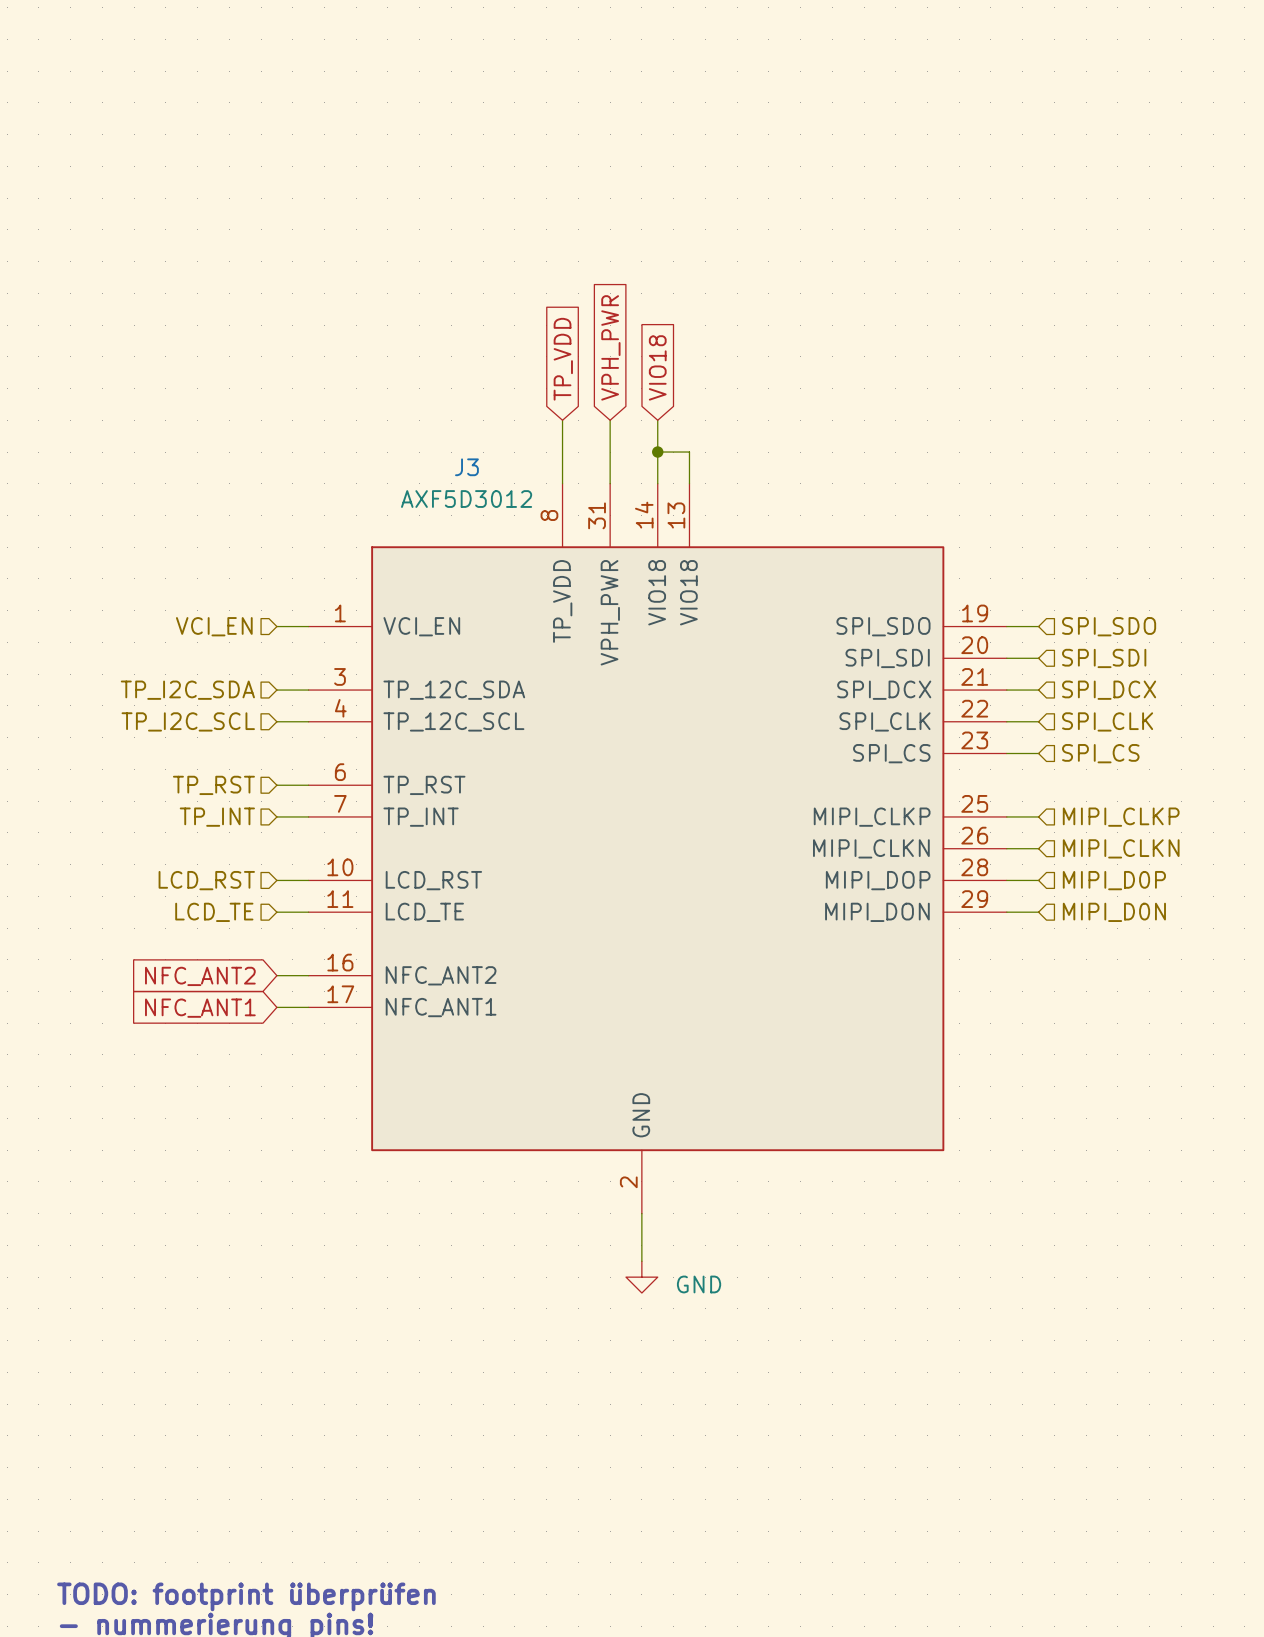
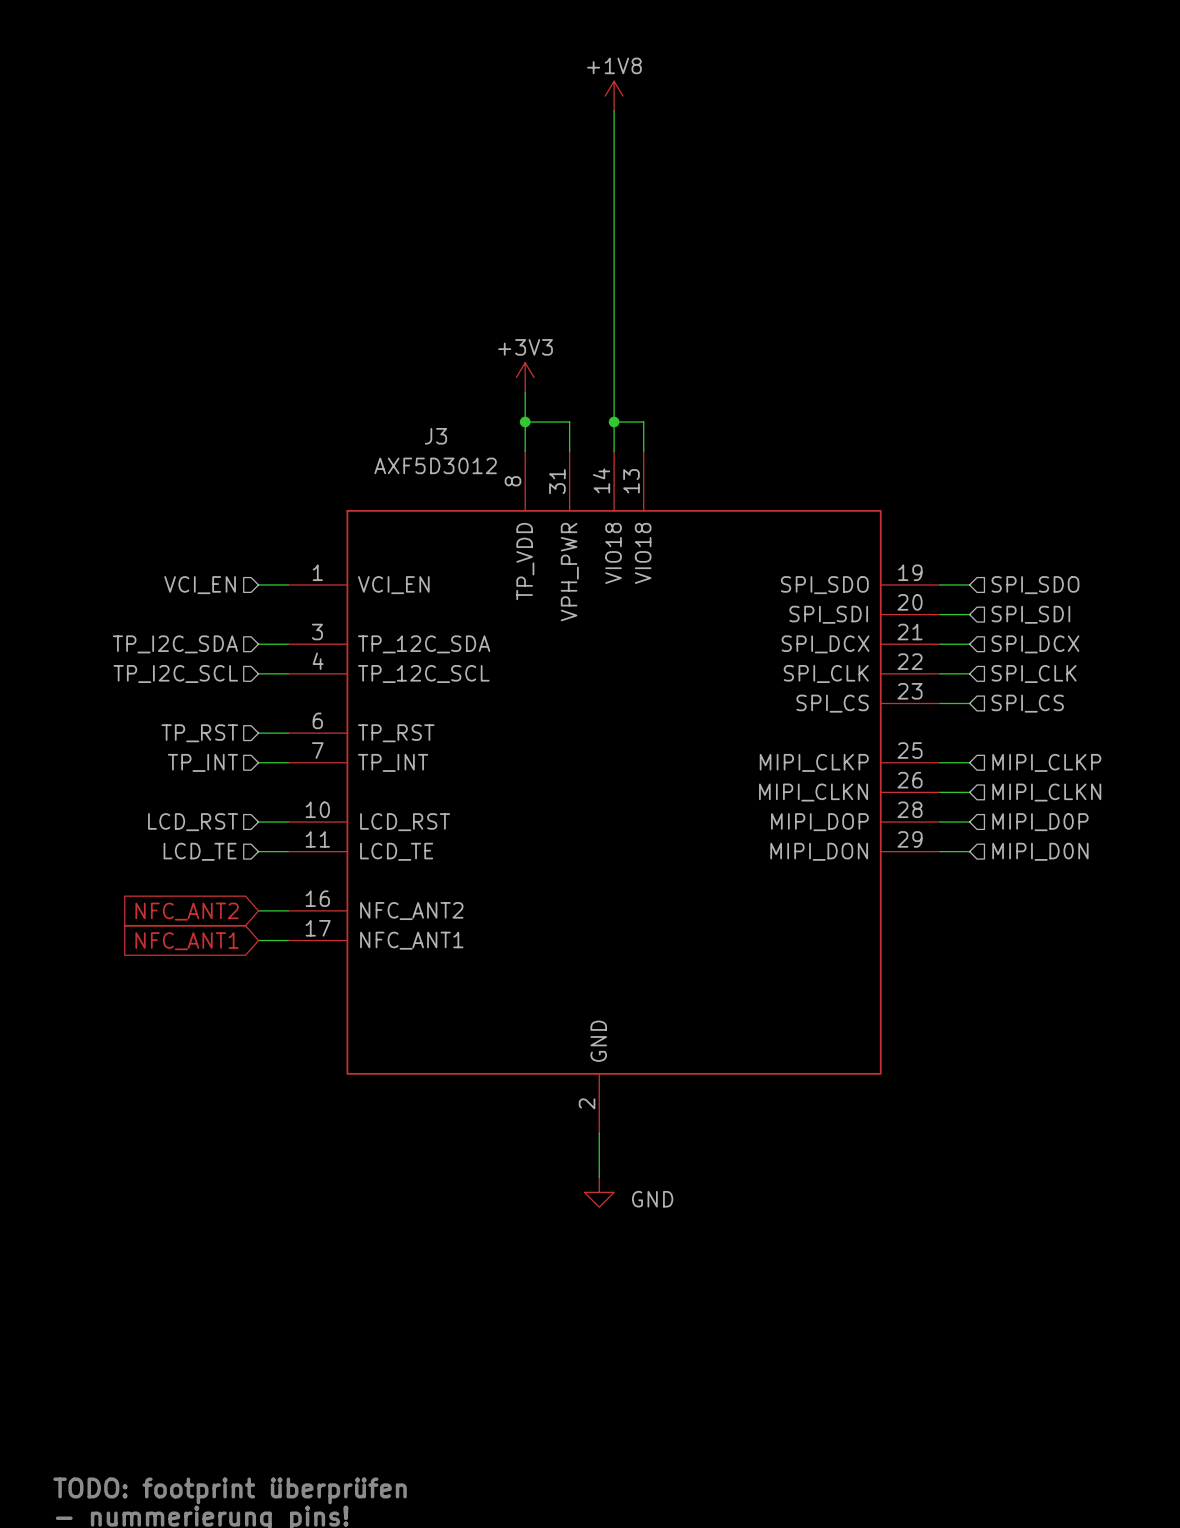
power symbol: none -> +1V8 (614, 96)
wire: none -> (614, 110) (614, 392)
global label: VPH_PWR (610, 347) -> none
global label: TP_VDD (563, 359) -> none
global label: VIO18 (657, 367) -> none
power symbol: none -> +3V3 (525, 377)
wire: (610, 420) (610, 452) -> (525, 422) (569, 422)
junction: none -> (525, 422)

